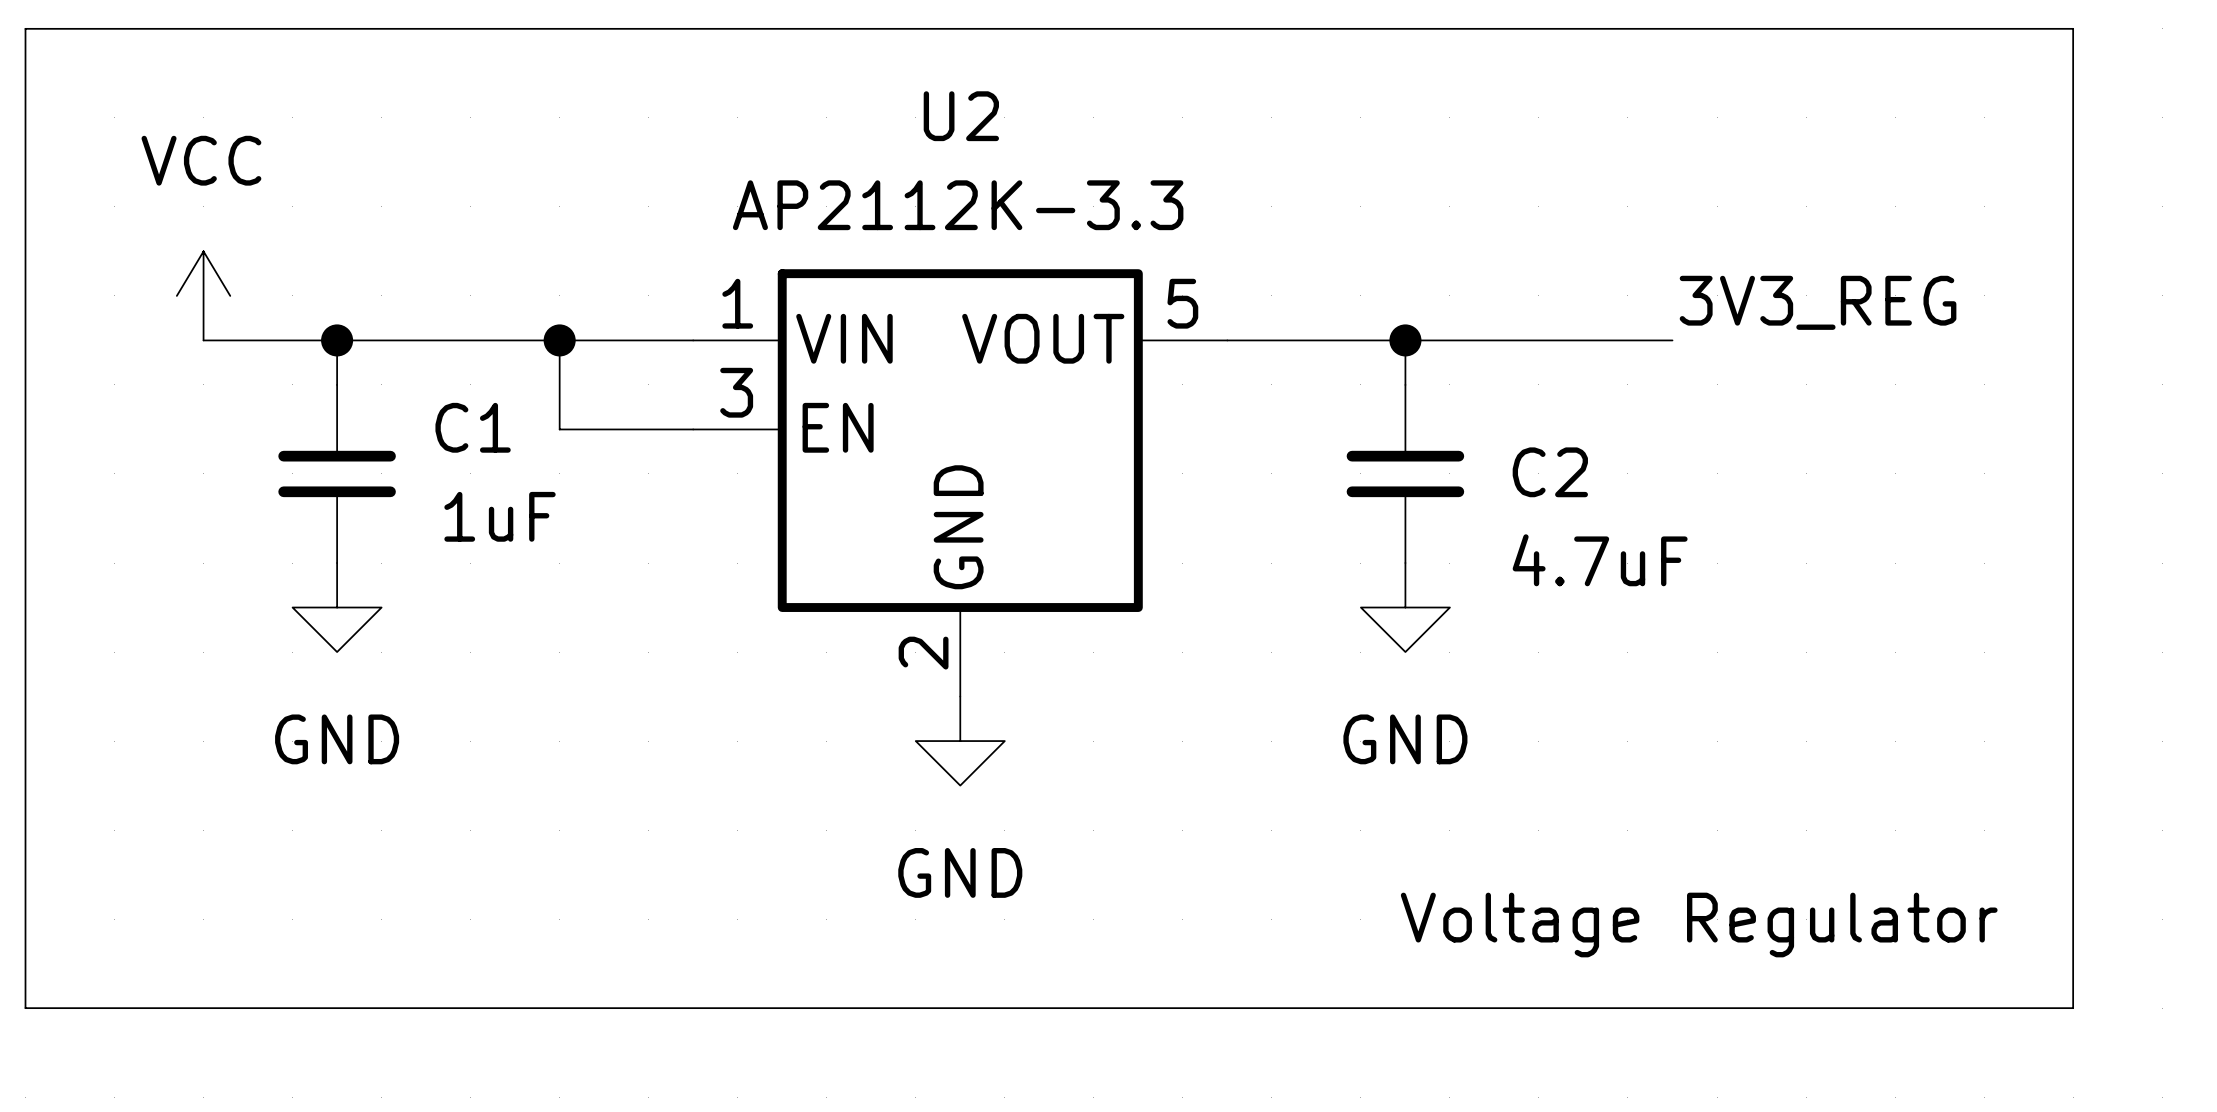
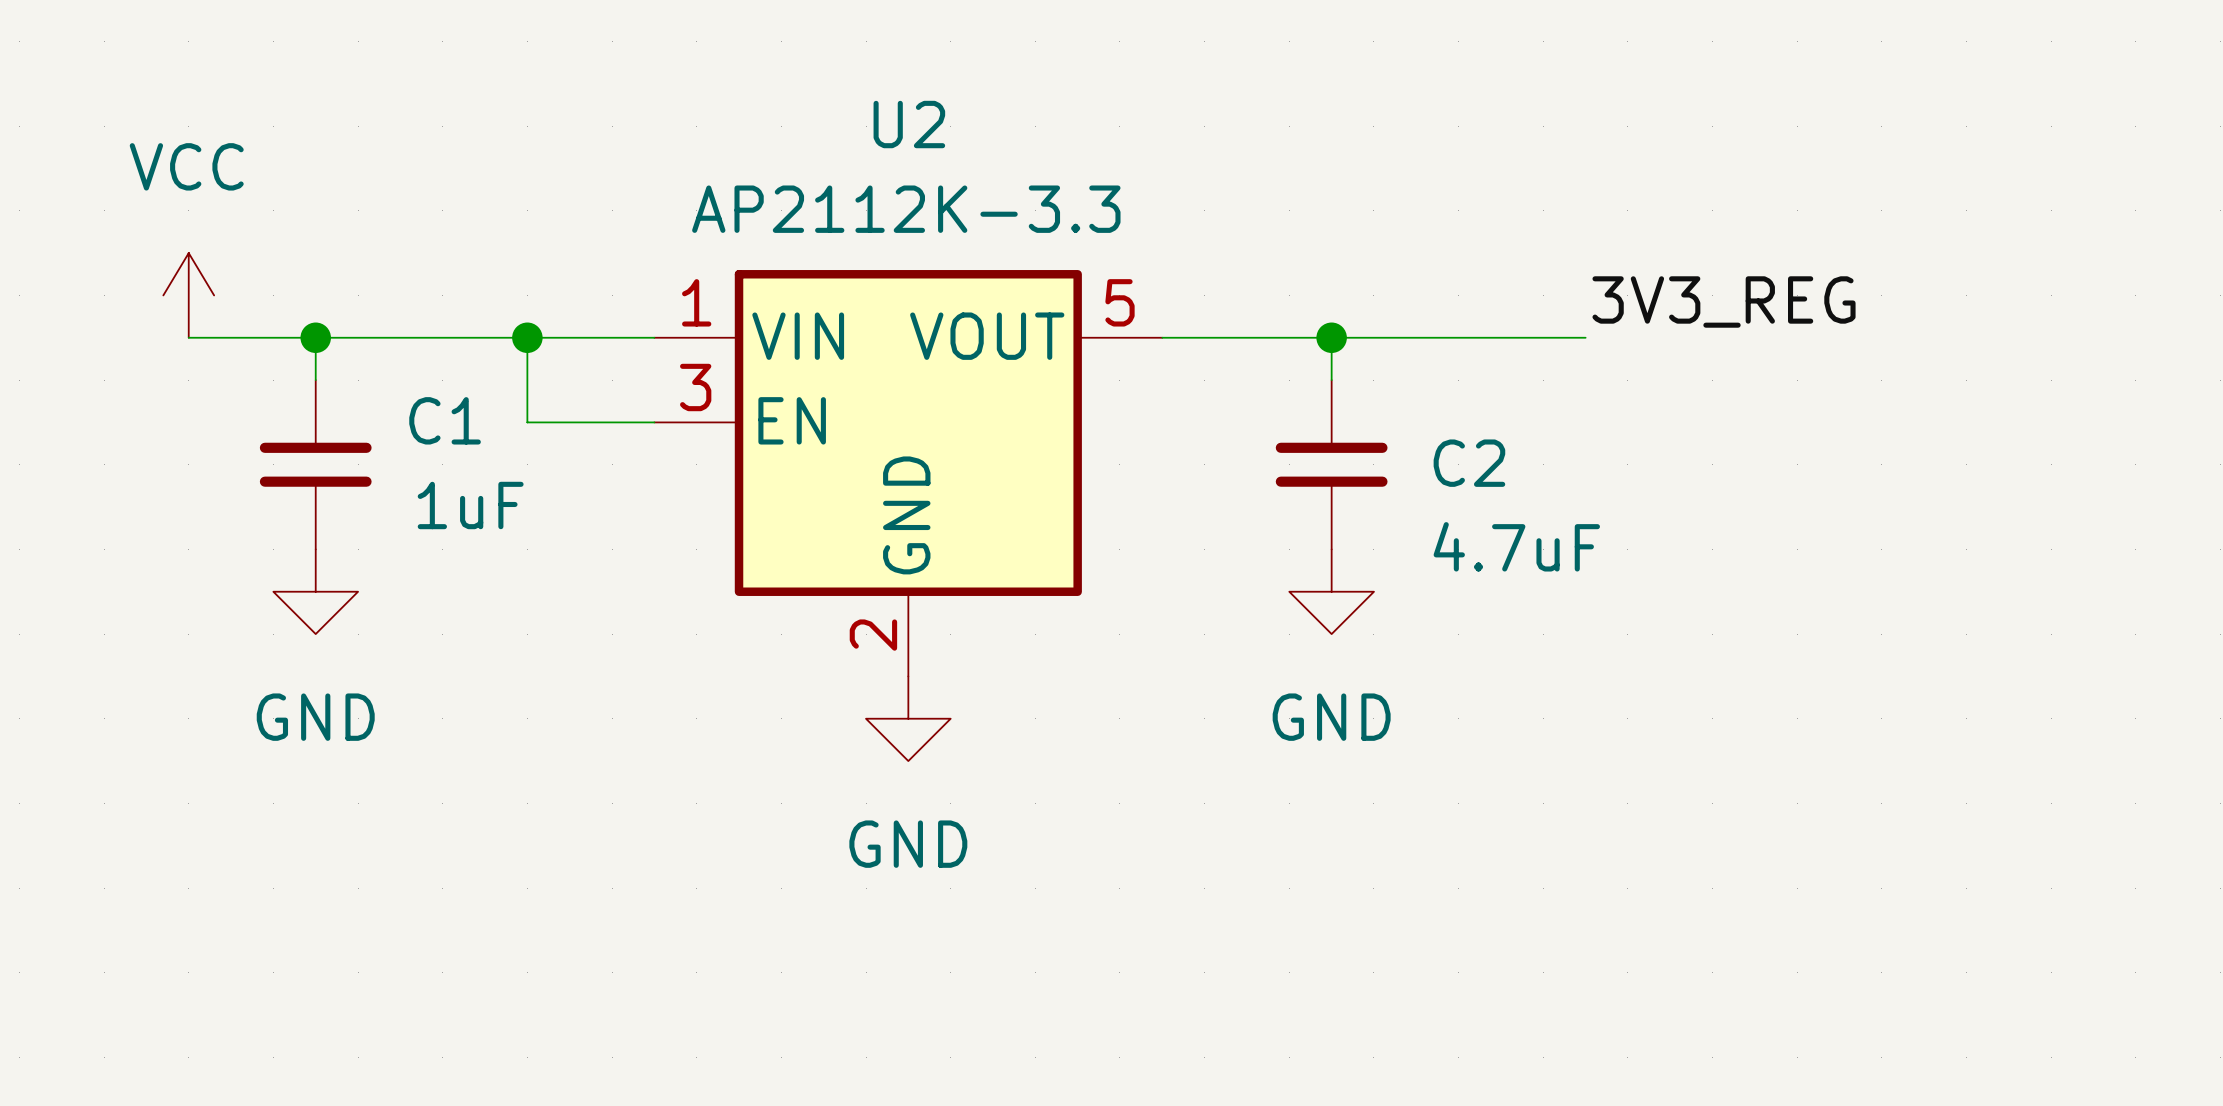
line: (25, 28) (2073, 28) (2073, 1008) (25, 1008) (25, 28) -> none
text: Voltage Regulator (1699, 925) -> none

